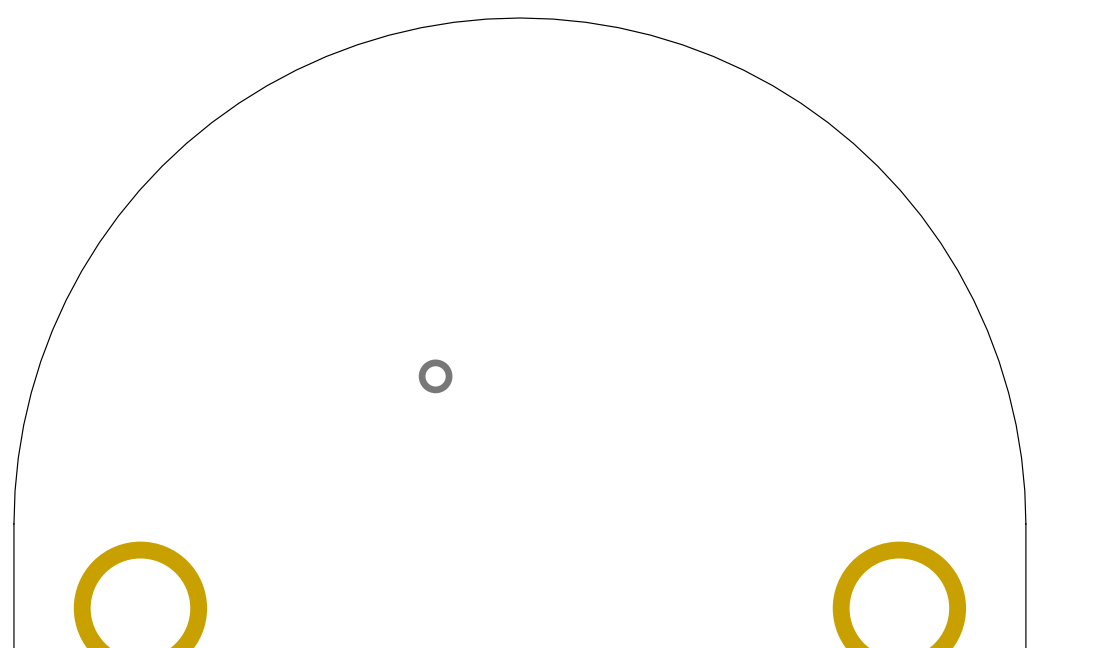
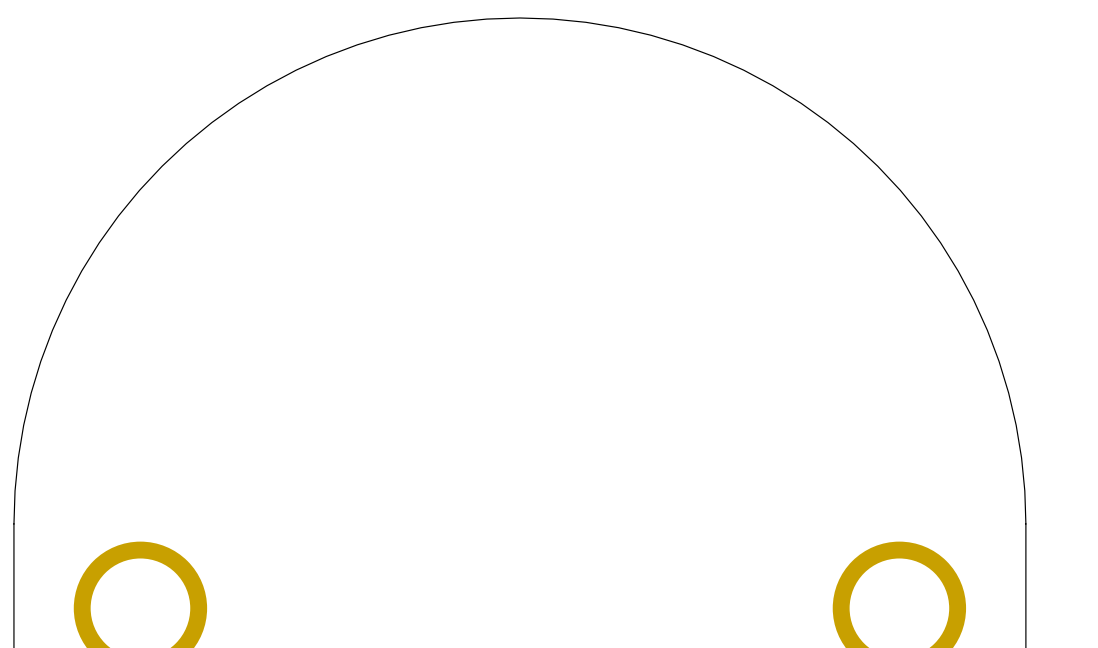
via: (435, 376) -> none

